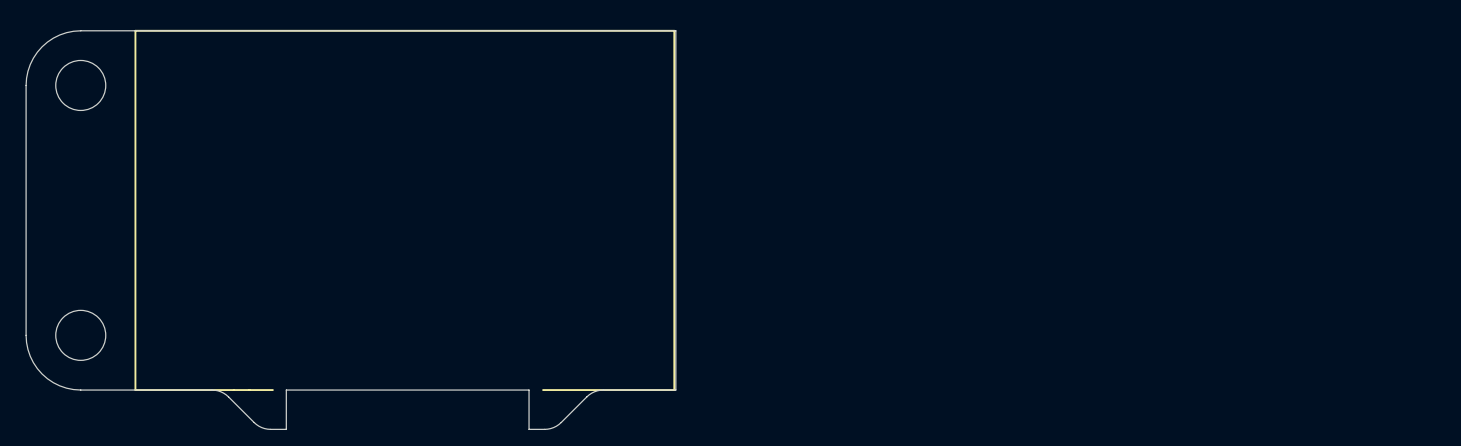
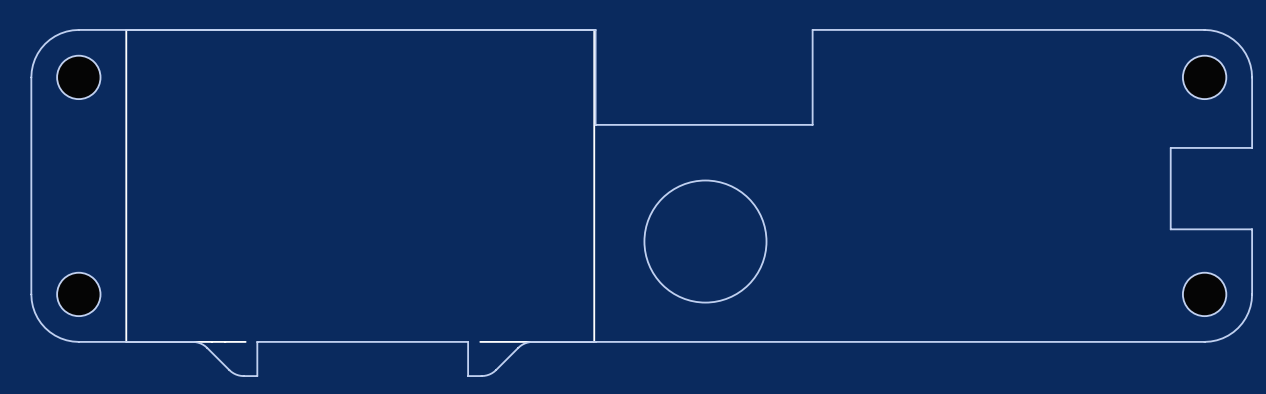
part: none -> (1204, 77)
board edge: (675, 140) (675, 390) -> (595, 124) (812, 124) (812, 29) (1210, 30) (1228, 36) (1238, 43) (1245, 53) (1251, 71) (1252, 147) (1170, 147) (1170, 229) (1252, 229) (1250, 306) (1245, 318) (1238, 328) (1222, 338) (1204, 341) (595, 341)
round board edge: none -> [644, 180, 767, 303]
part: none -> (1204, 294)

